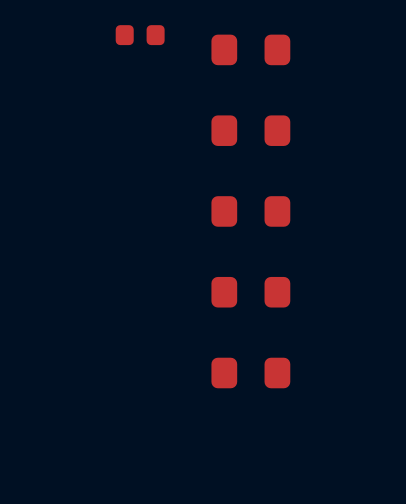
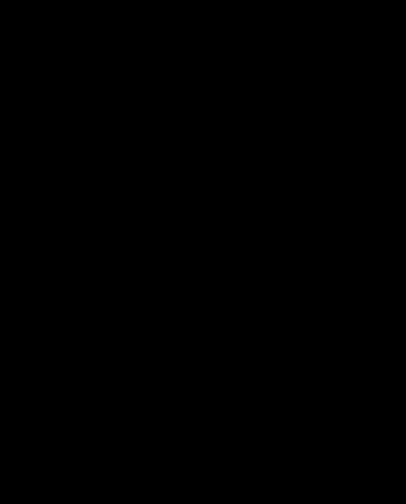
part: (140, 35) -> none
part: (250, 49) -> none
part: (250, 130) -> none
part: (250, 211) -> none
part: (250, 292) -> none
part: (250, 373) -> none

